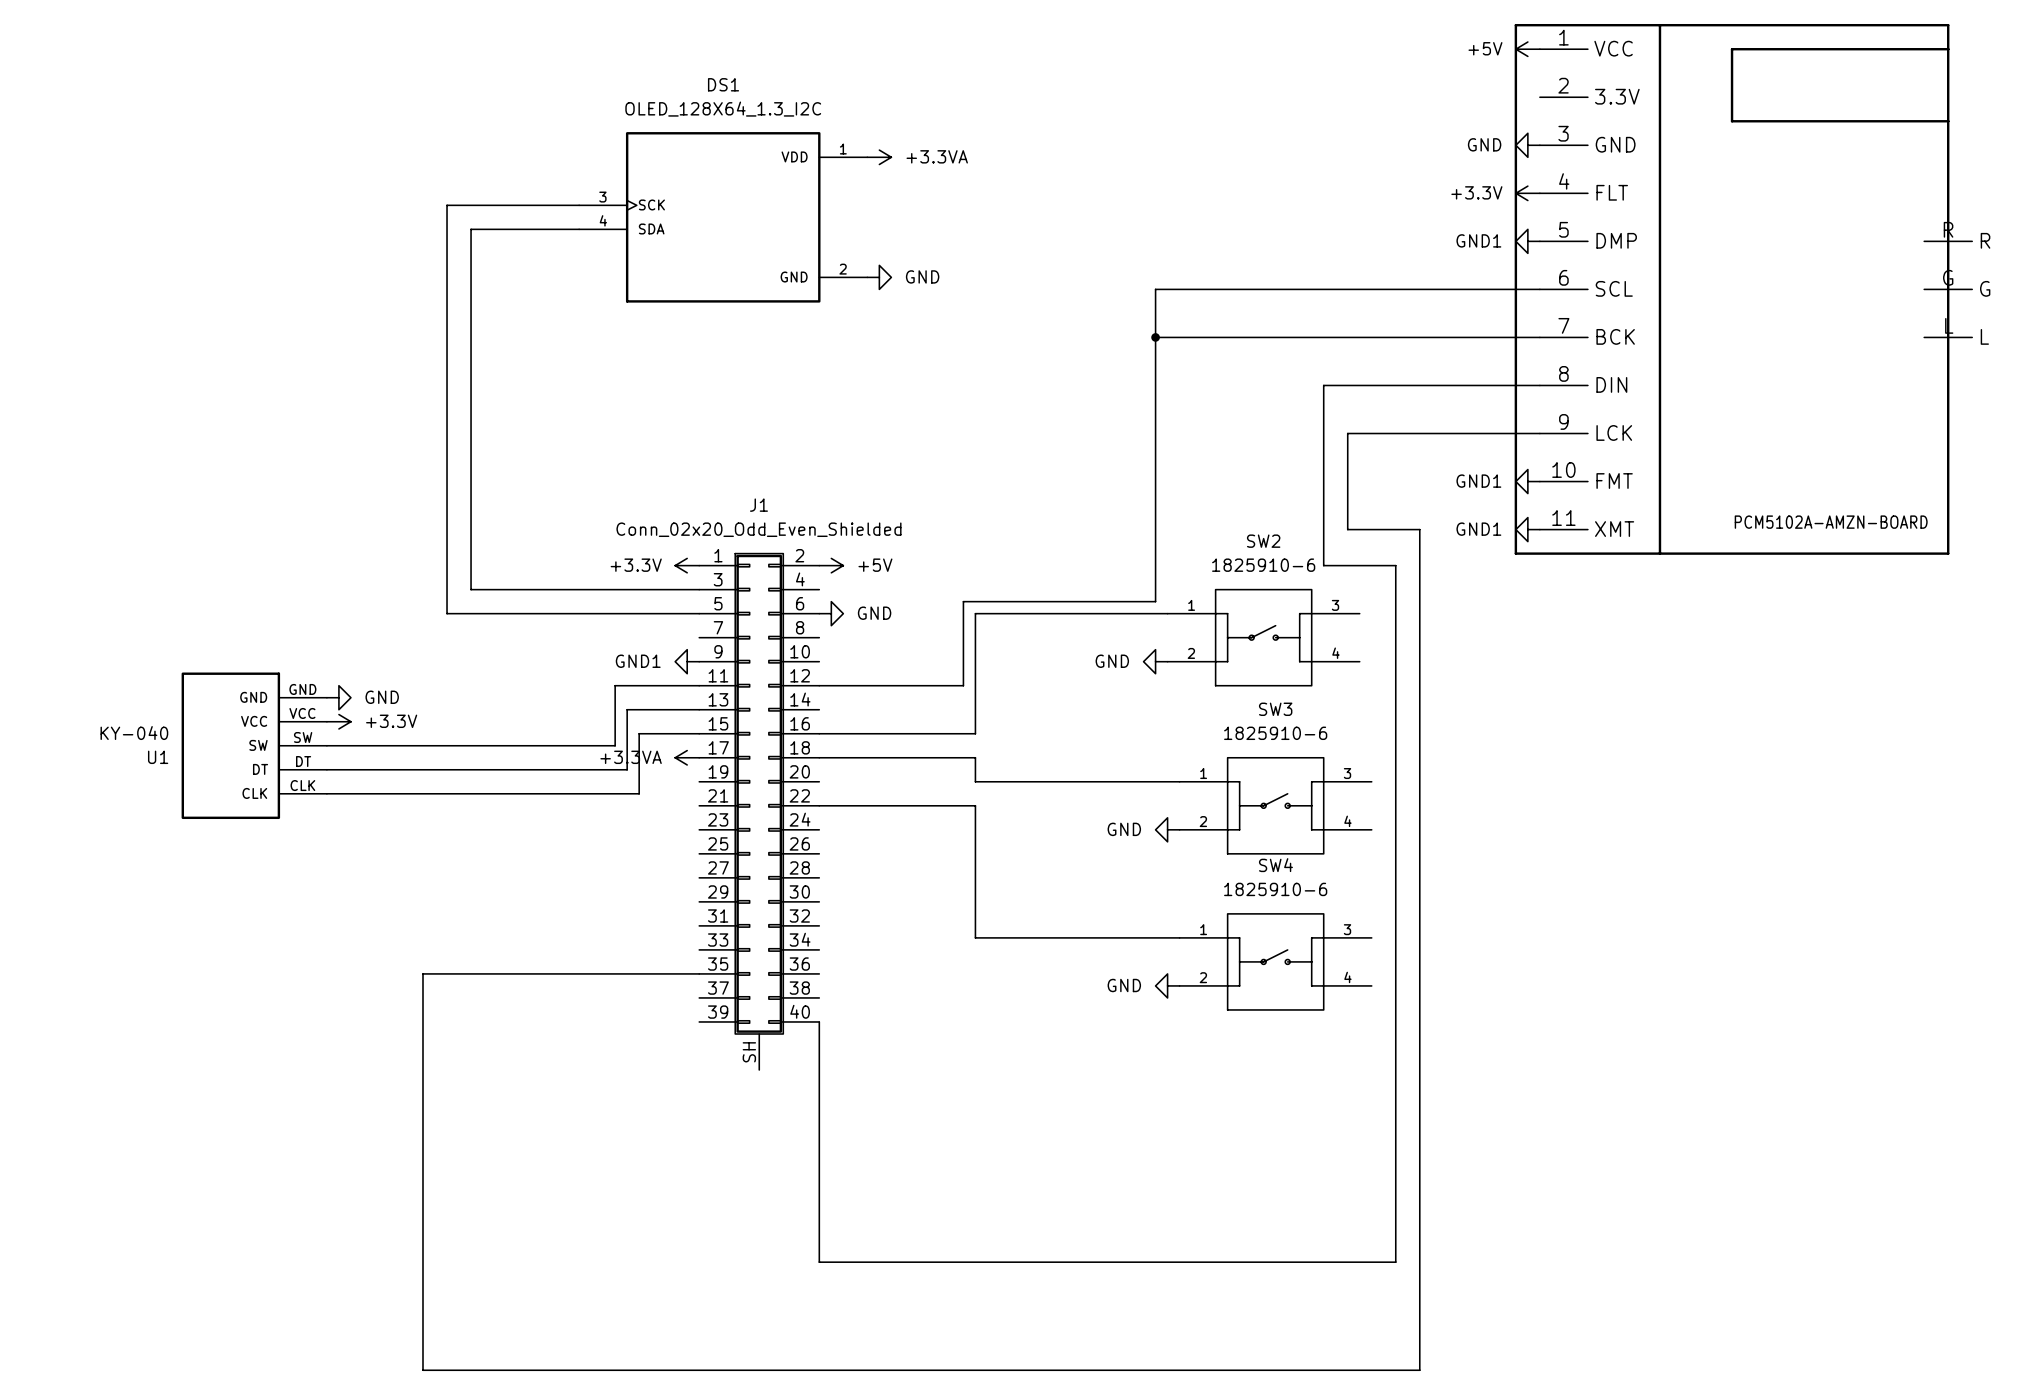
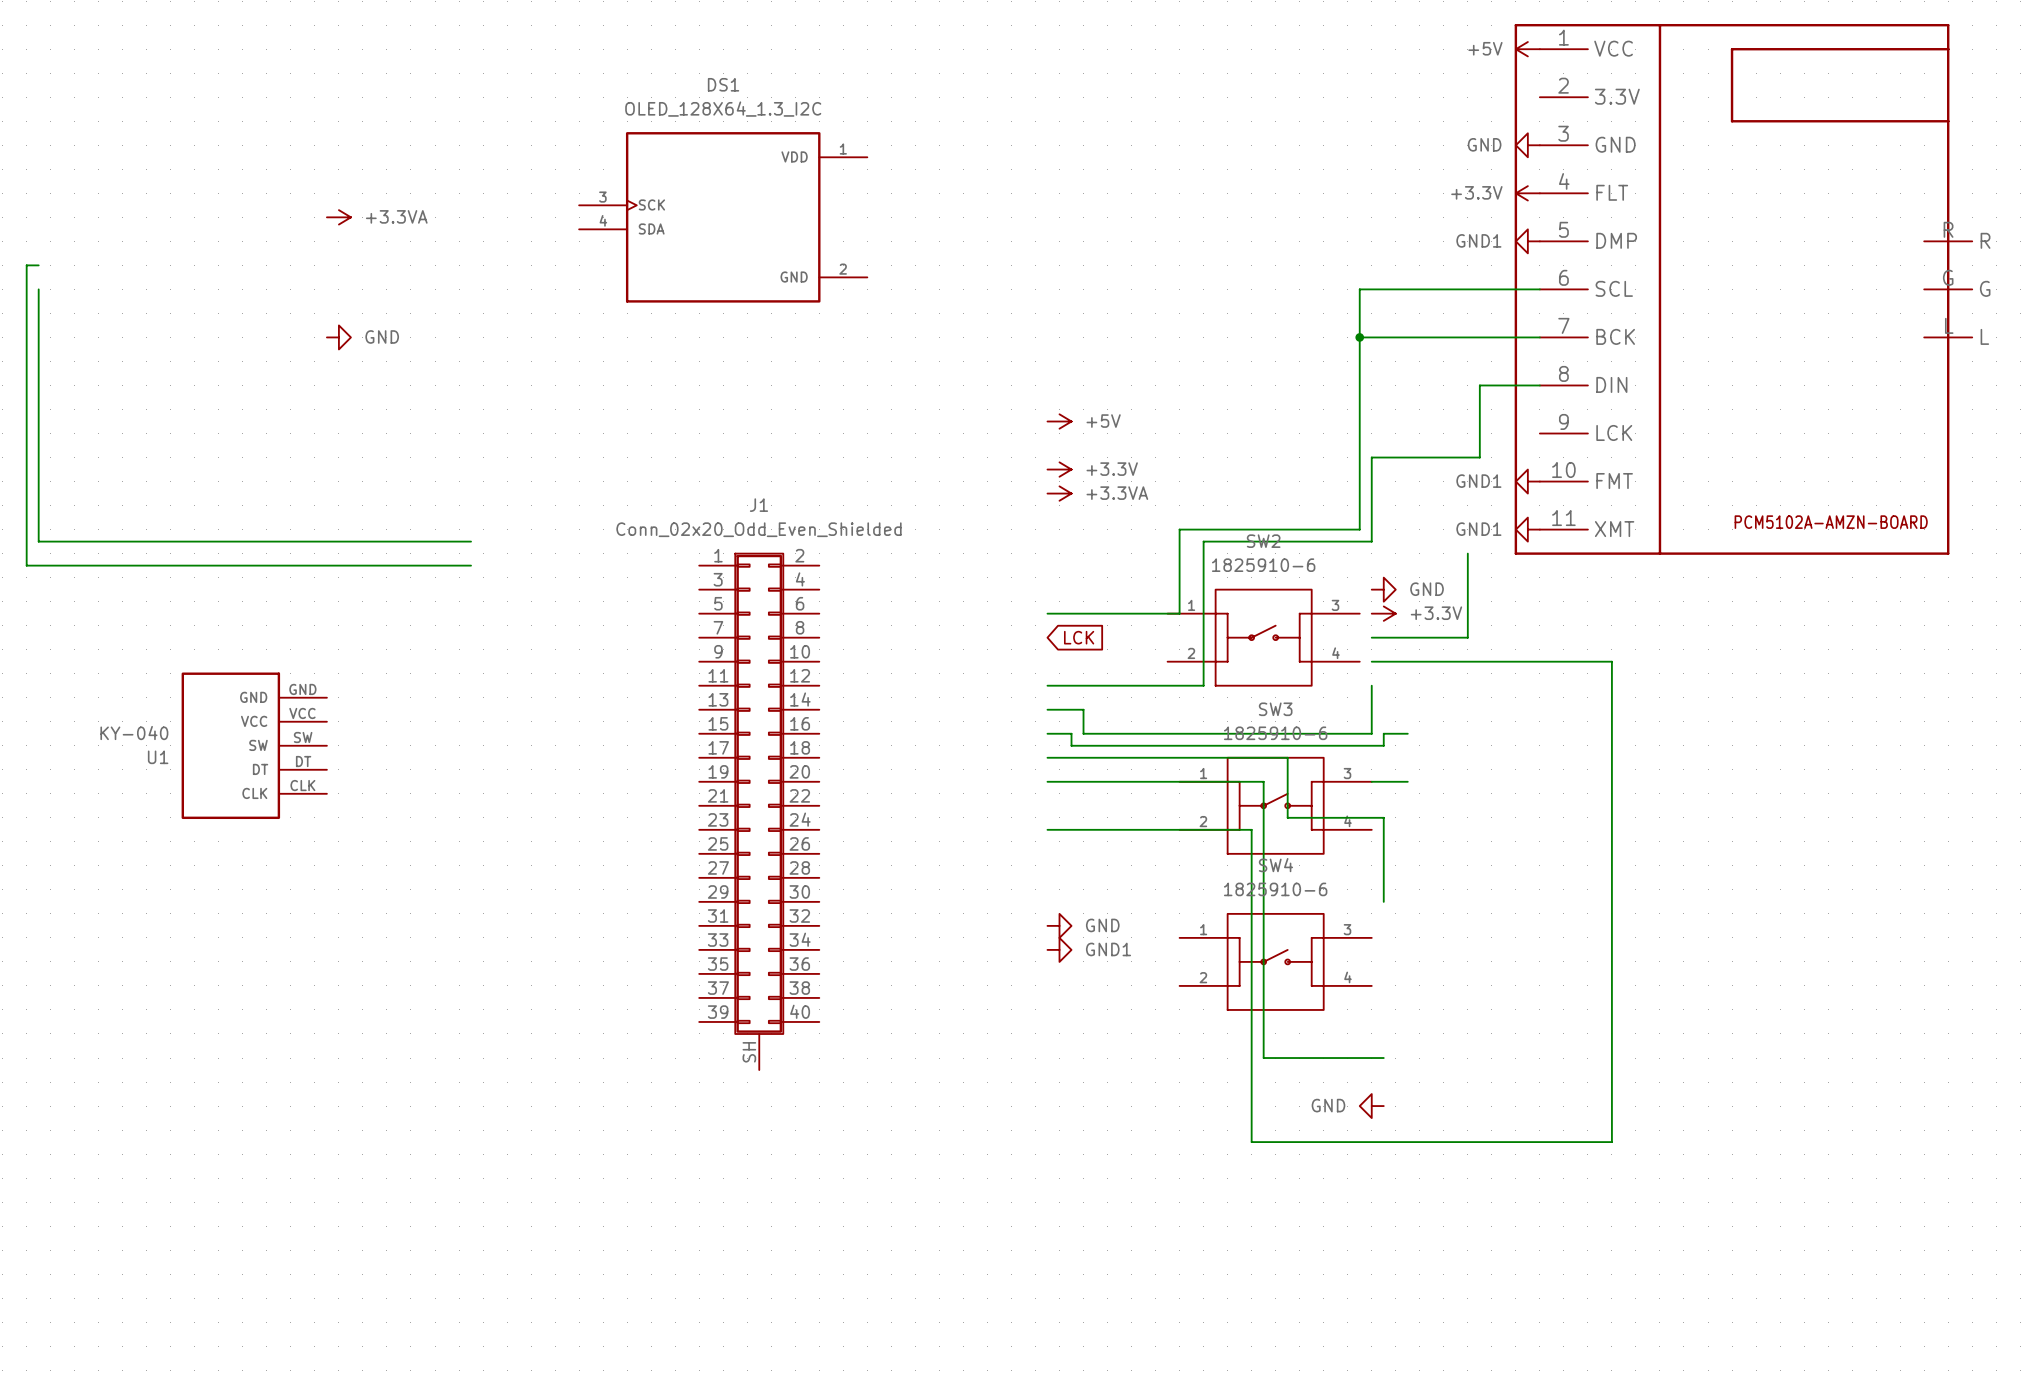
power symbol: +3.3VA (879, 157) -> none
wire: (579, 205) (447, 205) (447, 613) (699, 613) -> none
power symbol: none -> +3.3VA (338, 217)
wire: (579, 229) (471, 229) (471, 589) (699, 589) -> none
wire: none -> (38, 265) (26, 265) (26, 565) (471, 565)
power symbol: GND (879, 277) -> none
wire: none -> (38, 289) (38, 541) (471, 541)
wire: (1359, 289) (1155, 289) (1155, 601) (963, 601) (963, 685) (819, 685) -> (1359, 289) (1359, 529)
power symbol: none -> GND (338, 337)
wire: (1155, 337) (1359, 337) -> none
junction: (1155, 337) -> none
junction: none -> (1359, 337)
wire: (1479, 385) (1323, 385) (1323, 565) (1395, 565) (1395, 1262) (819, 1262) (819, 1021) -> (1479, 385) (1479, 457) (1371, 457) (1371, 541) (1203, 541) (1203, 685) (1047, 685)
power symbol: none -> +5V (1059, 421)
wire: (1539, 433) (1347, 433) (1347, 529) -> (1167, 613) (1179, 613) (1179, 529) (1347, 529)
power symbol: none -> +3.3V (1059, 469)
power symbol: none -> +3.3VA (1059, 493)
wire: (1359, 529) (1419, 529) (1419, 1370) (422, 1370) (422, 973) (699, 973) -> none
wire: none -> (1467, 553) (1467, 637) (1371, 637)
power symbol: +3.3V (687, 565) -> none
power symbol: +5V (831, 565) -> none
power symbol: none -> GND (1383, 589)
power symbol: GND (831, 613) -> none
wire: (1047, 613) (975, 613) (975, 733) (819, 733) -> none
power symbol: none -> +3.3V (1383, 613)
global label: none -> LCK (1079, 637)
power symbol: GND1 (687, 661) -> none
power symbol: GND (1155, 661) -> none
wire: none -> (1371, 661) (1611, 661) (1611, 1142) (1251, 1142) (1251, 829) (1047, 829)
wire: (699, 685) (615, 685) (615, 745) (326, 745) -> none
wire: none -> (1371, 685) (1371, 733) (1083, 733) (1083, 709) (1047, 709)
power symbol: GND (338, 697) -> none
wire: (699, 709) (627, 709) (627, 769) (326, 769) -> none
power symbol: +3.3V (338, 721) -> none
wire: (699, 733) (639, 733) (639, 793) (326, 793) -> none
wire: none -> (1047, 733) (1071, 733) (1071, 745) (1383, 745) (1383, 733) (1407, 733)
power symbol: +3.3VA (687, 757) -> none
wire: (819, 757) (975, 757) (975, 781) (1047, 781) -> none
wire: none -> (1047, 757) (1287, 757) (1287, 817) (1383, 817) (1383, 901)
wire: none -> (1179, 781) (1263, 781) (1263, 1058) (1383, 1058)
wire: none -> (1371, 781) (1407, 781)
wire: (819, 805) (975, 805) (975, 937) (1179, 937) -> none
power symbol: GND (1167, 829) -> none
power symbol: none -> GND (1059, 925)
power symbol: none -> GND1 (1059, 949)
power symbol: GND (1167, 985) -> none
power symbol: none -> GND (1371, 1106)

